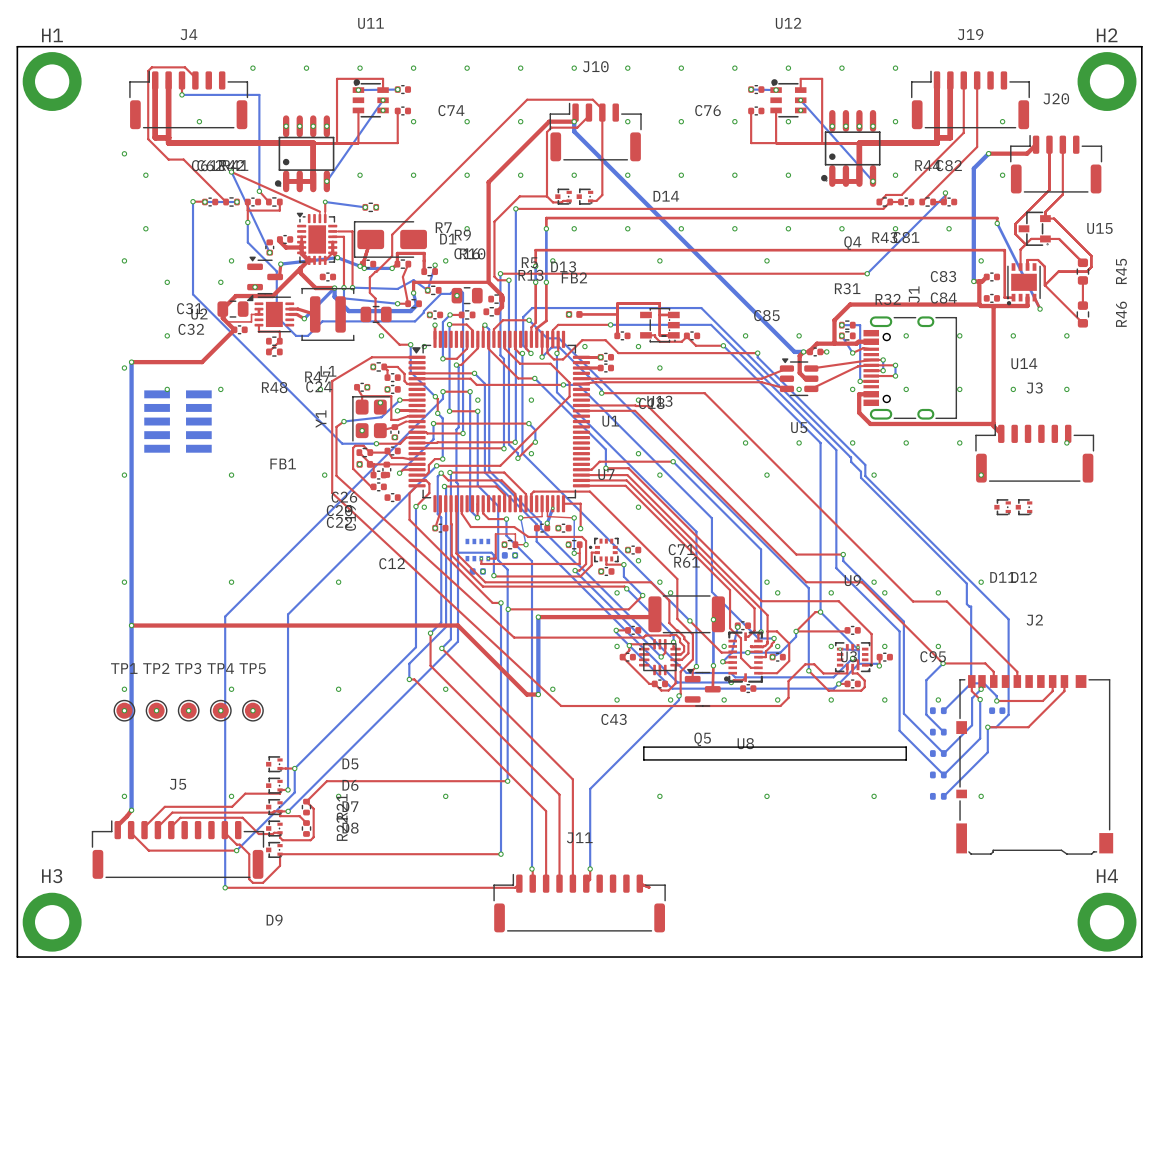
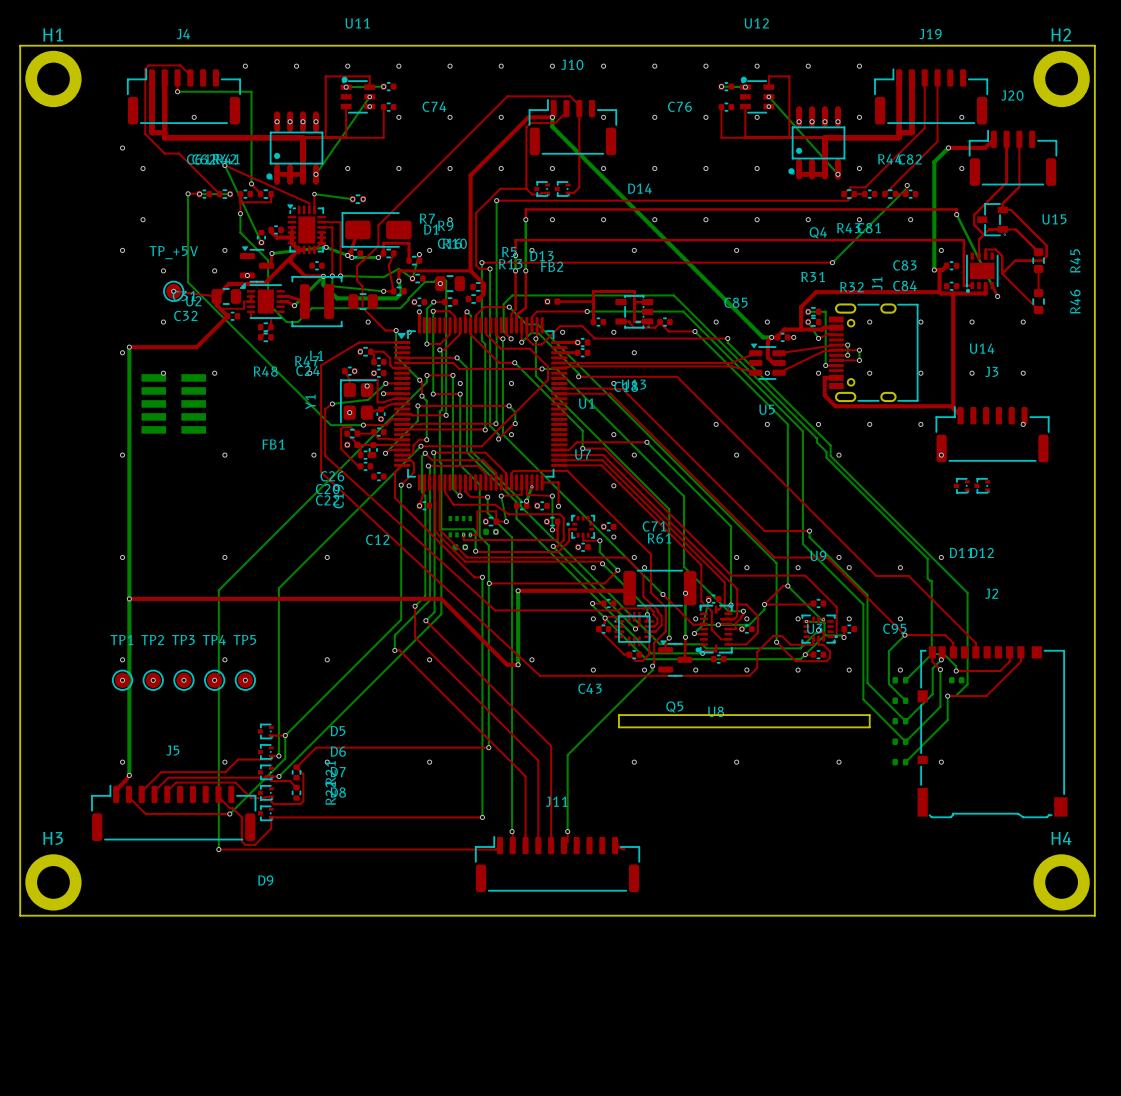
top track: none -> (173, 291) (216, 296)
TP_+5V: none -> (173, 291)
via: none -> (173, 291)

